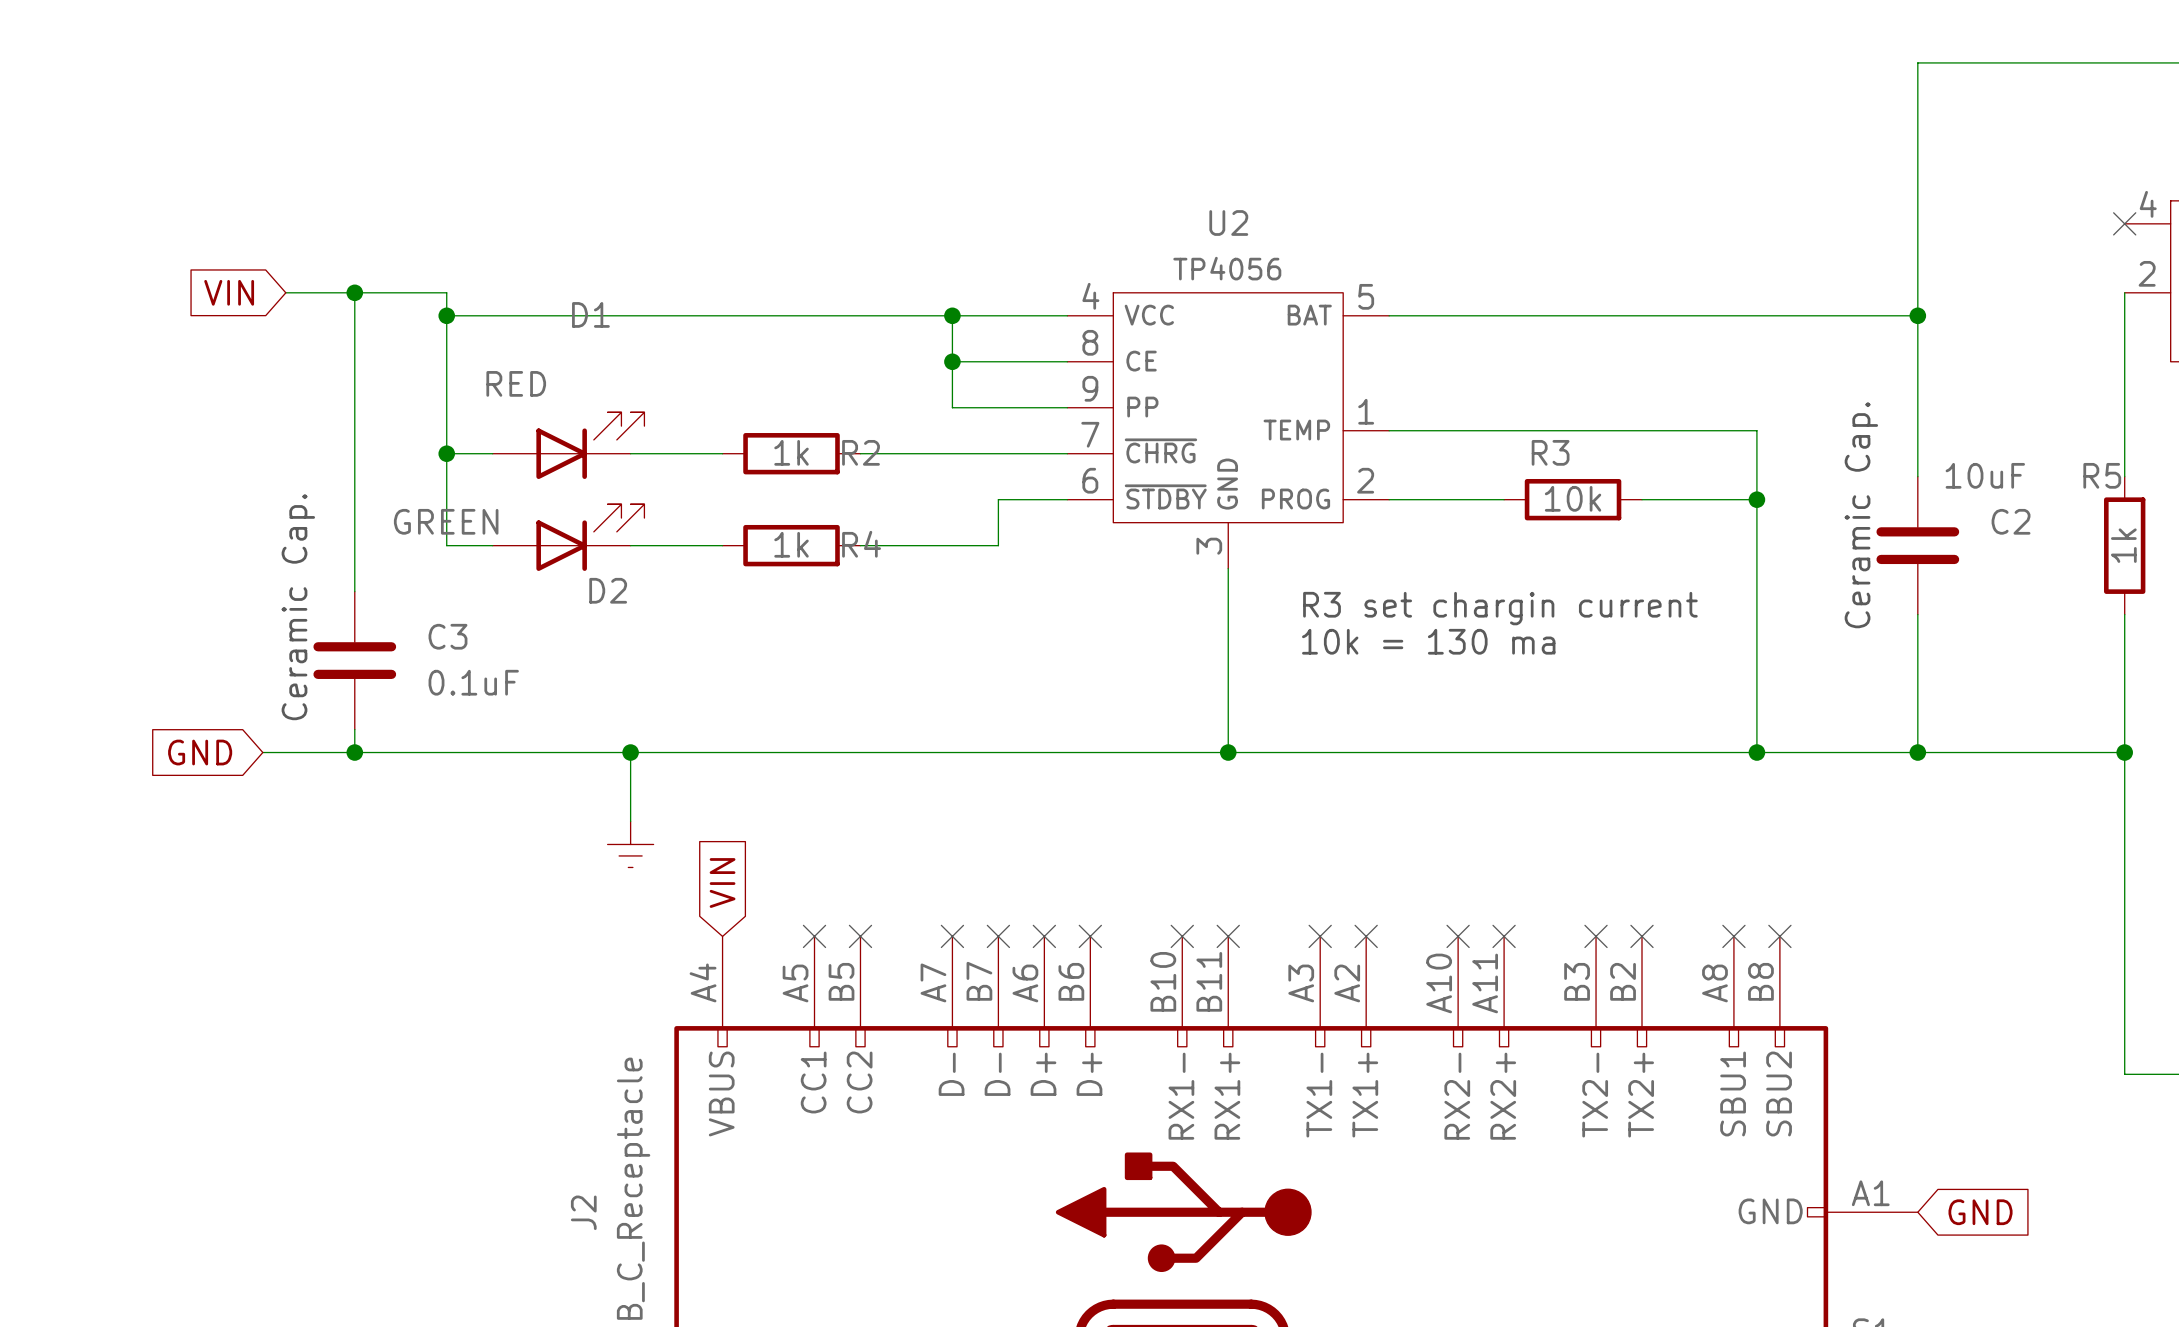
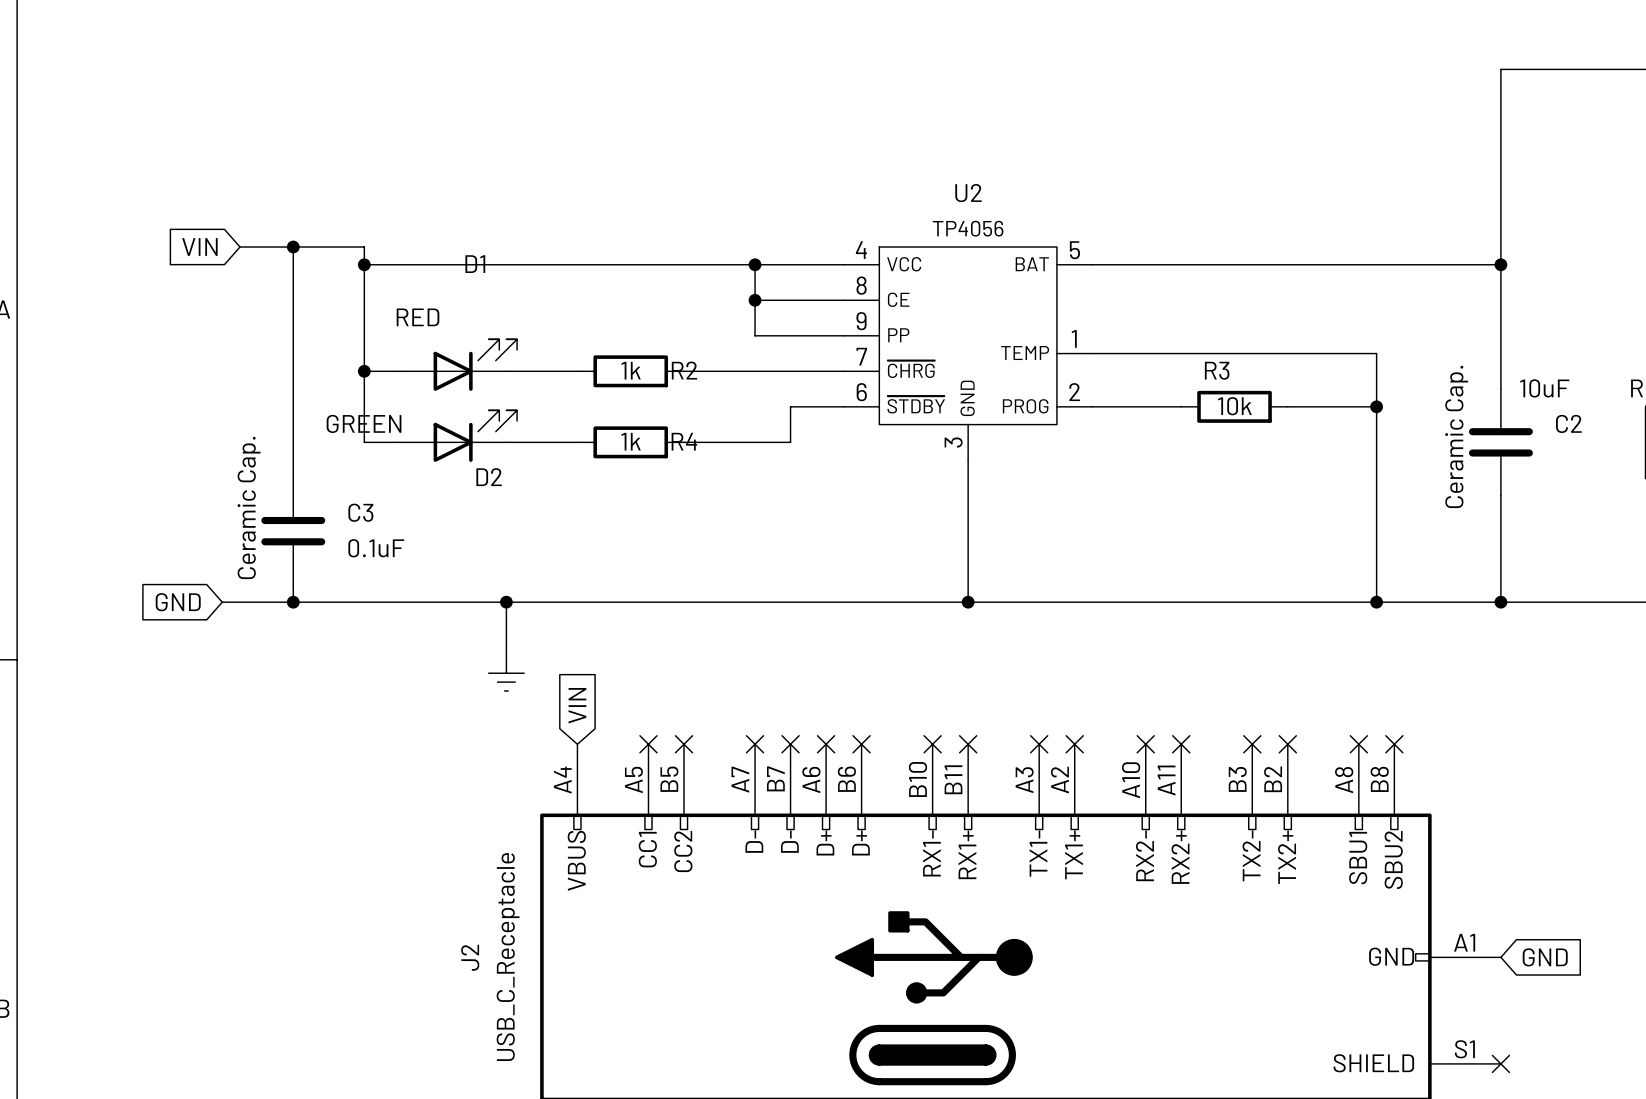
text: R3 set chargin current (1500, 608) -> none
text: 10k = 130 ma (1428, 641) -> none

